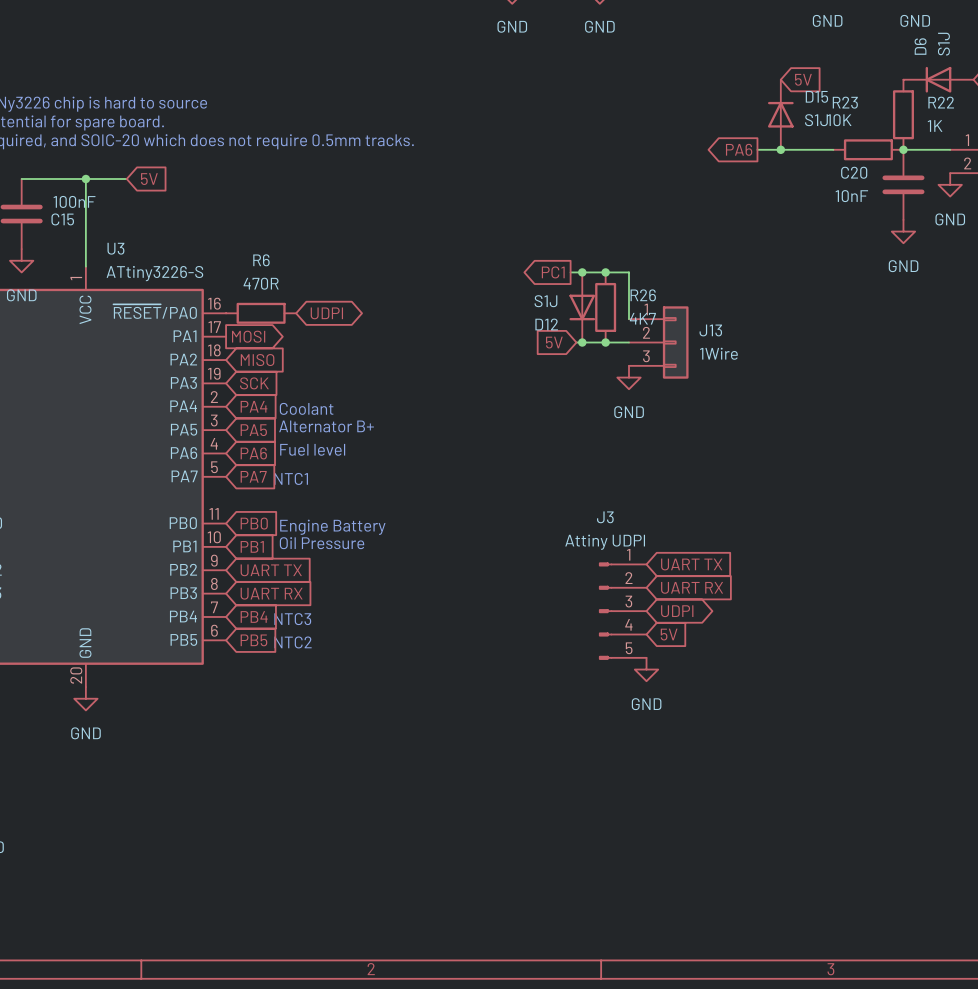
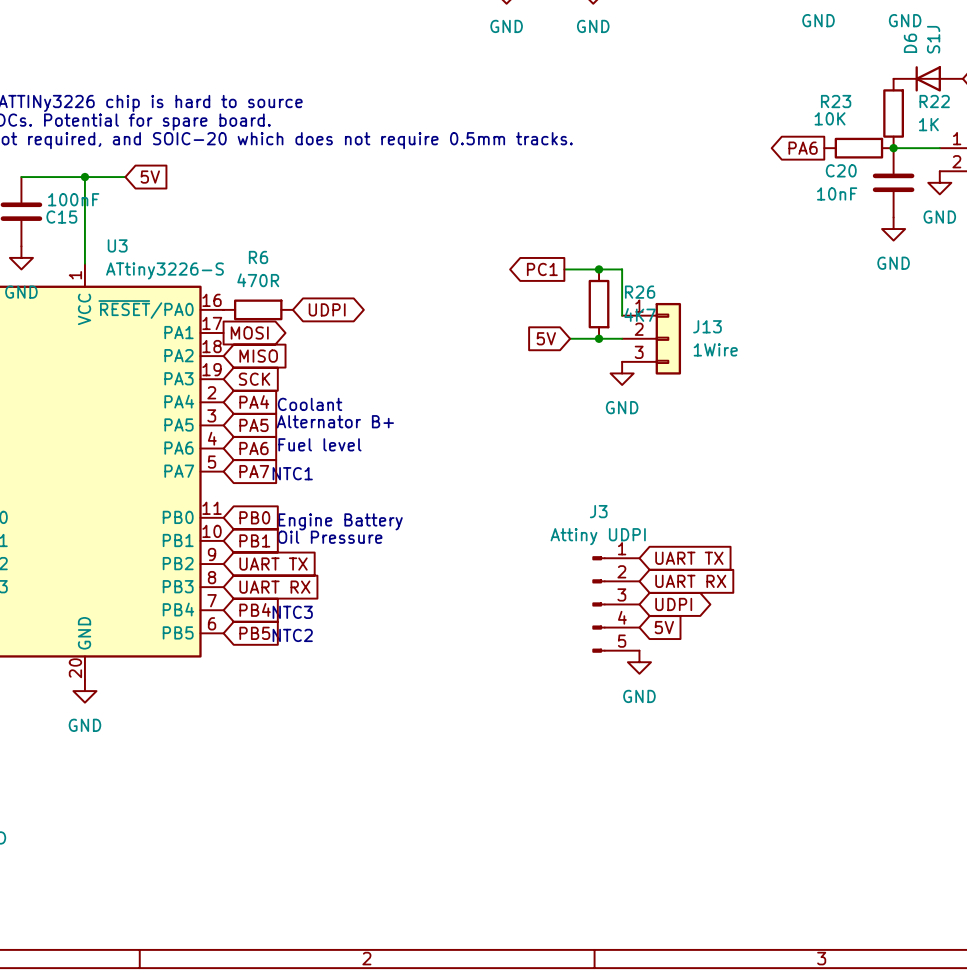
global label: 5V (803, 79) -> none
D15: S1J (780, 114) -> none
global label position: PA6 (739, 149) -> PA6 (803, 148)
wire: (757, 149) (833, 149) -> none
junction: (780, 149) -> none
junction: (582, 272) -> none
D12: S1J (582, 307) -> none
junction: (582, 342) -> none

